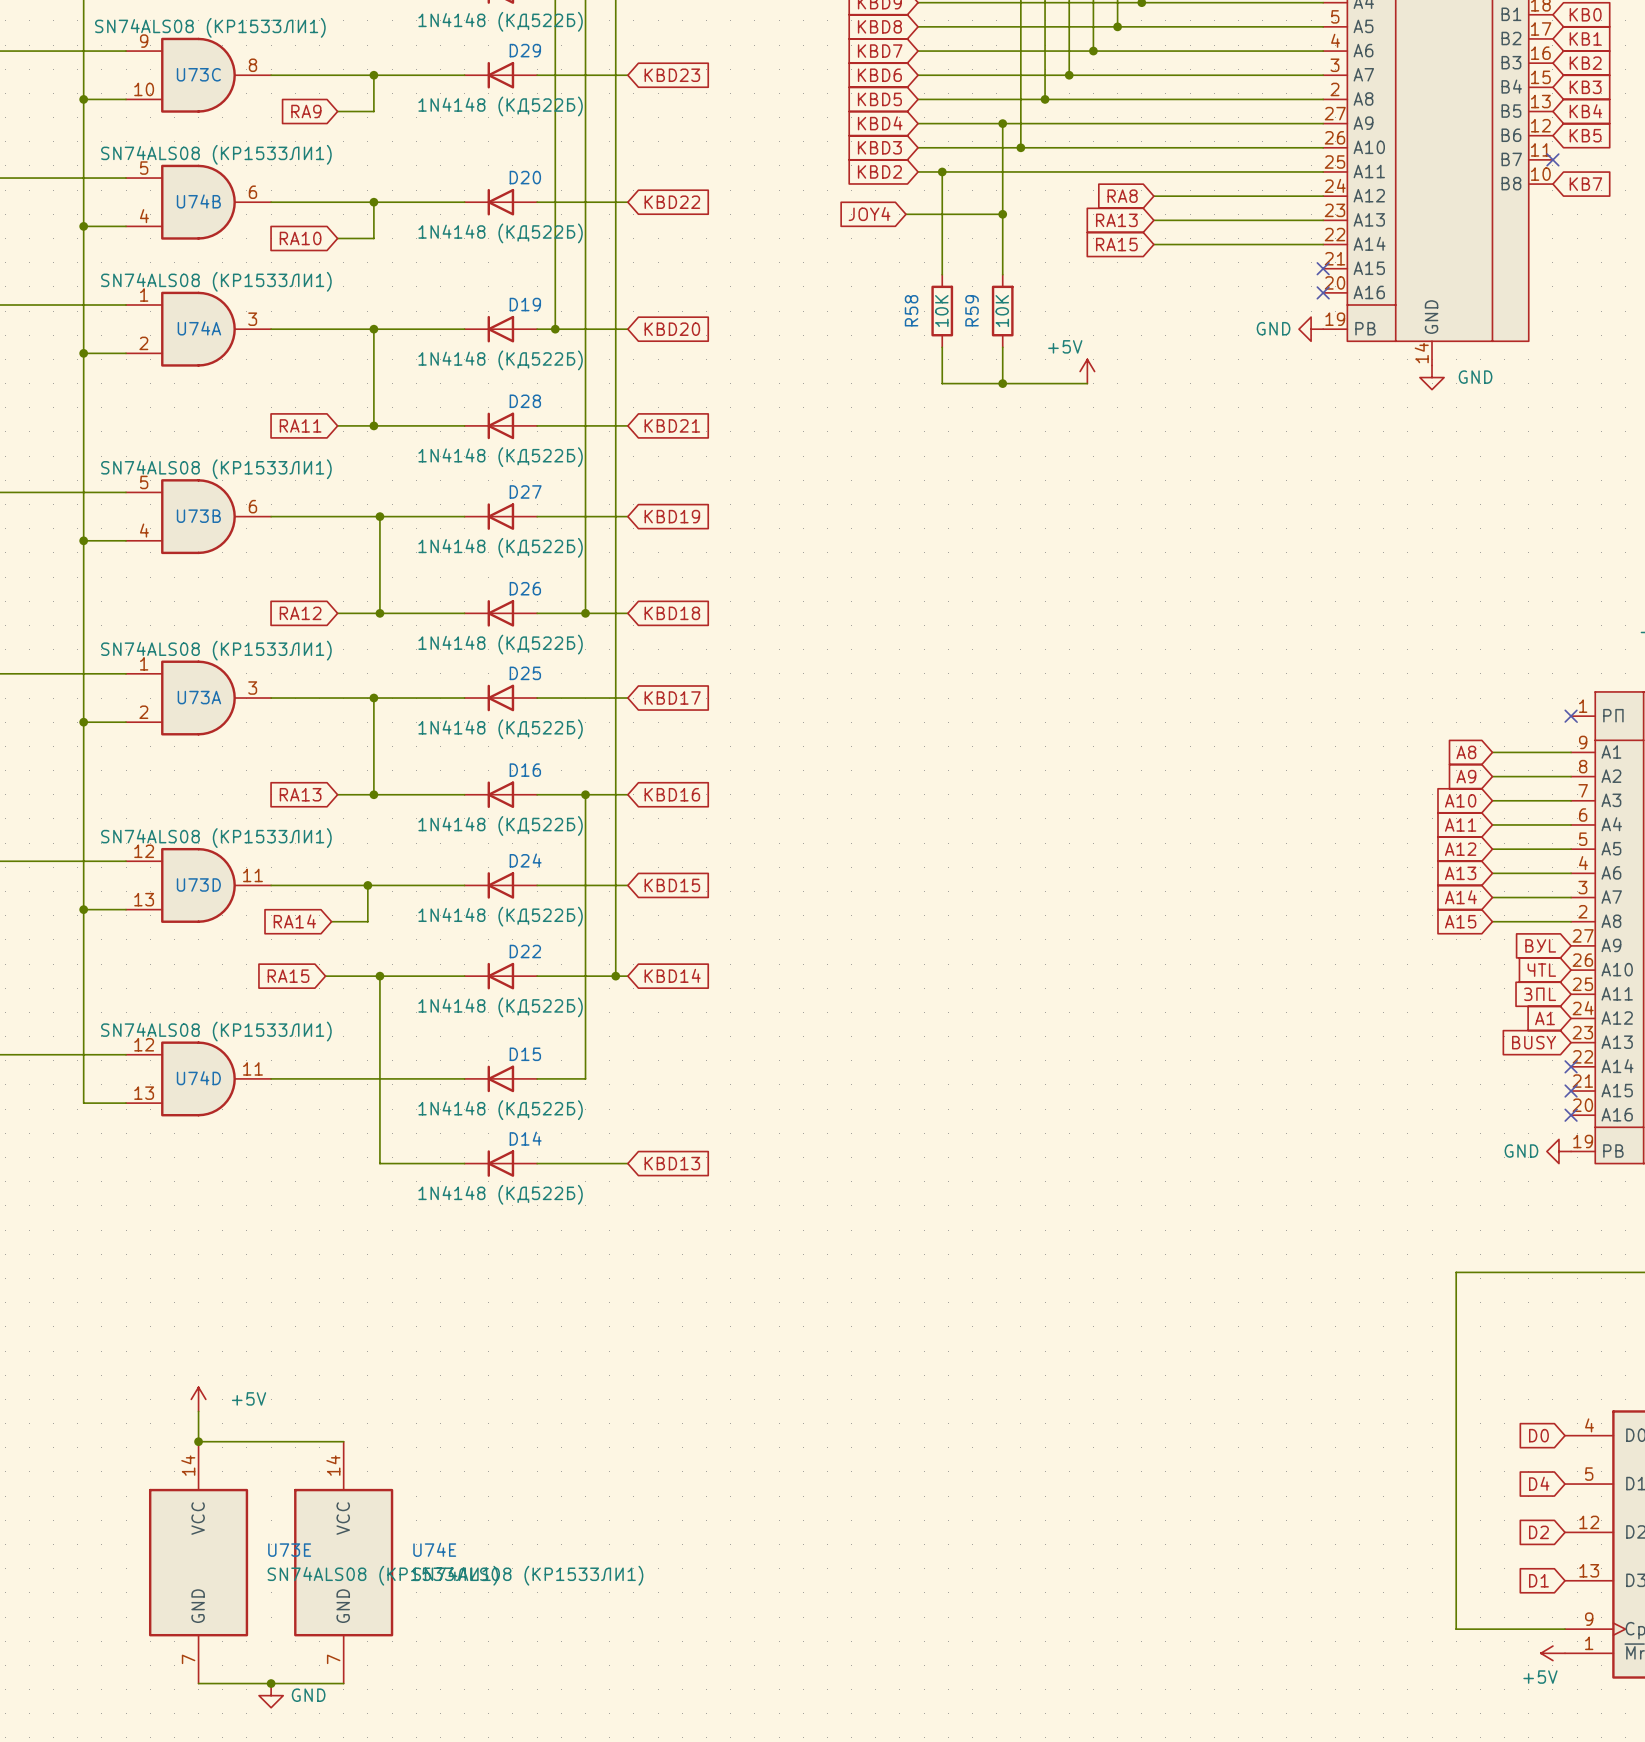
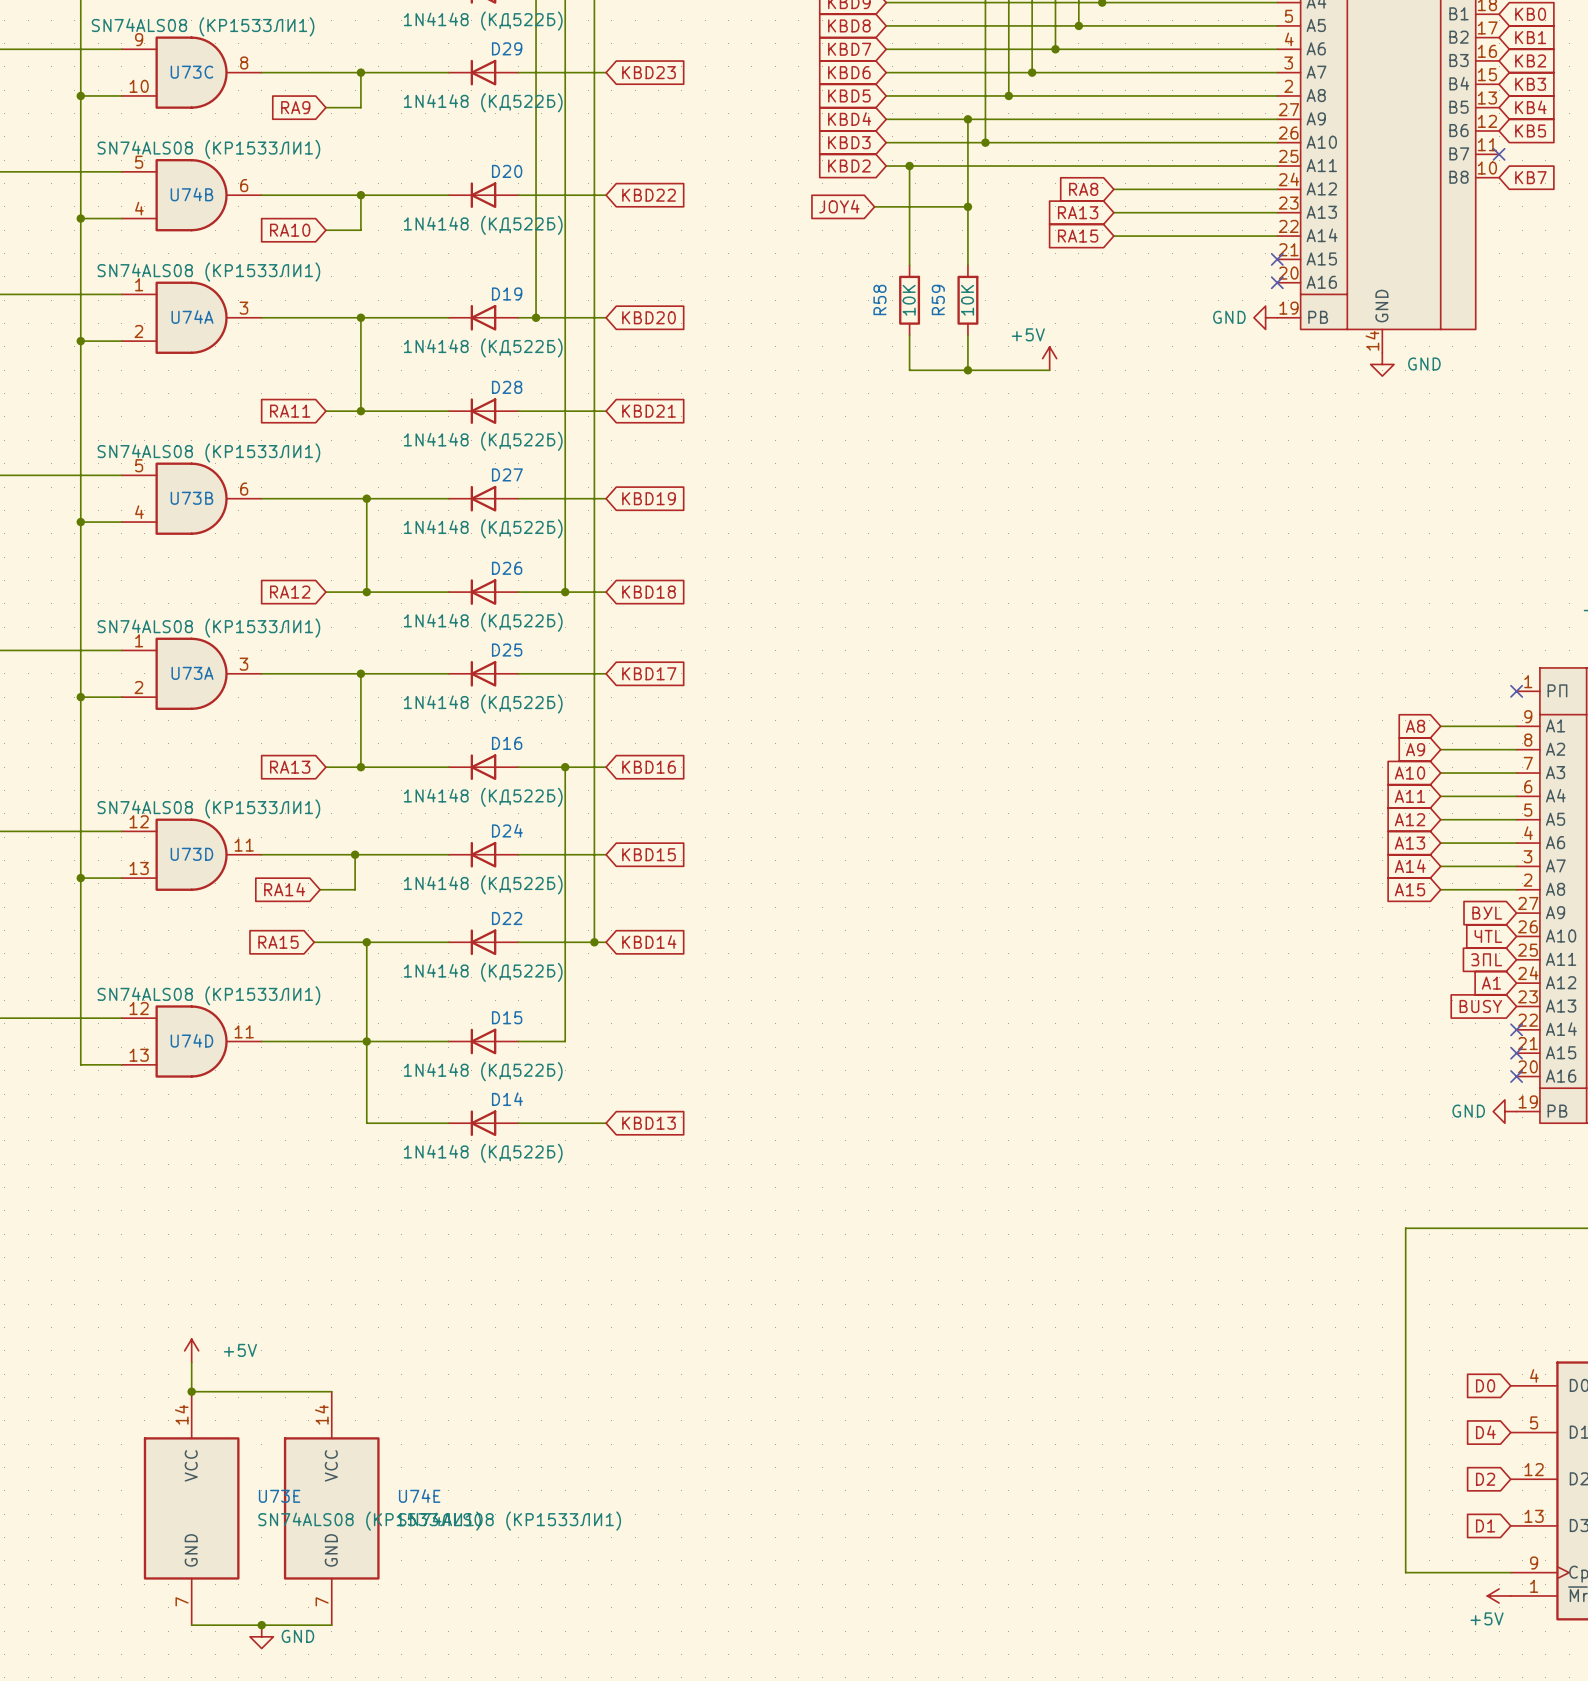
junction: none -> (366, 1041)

